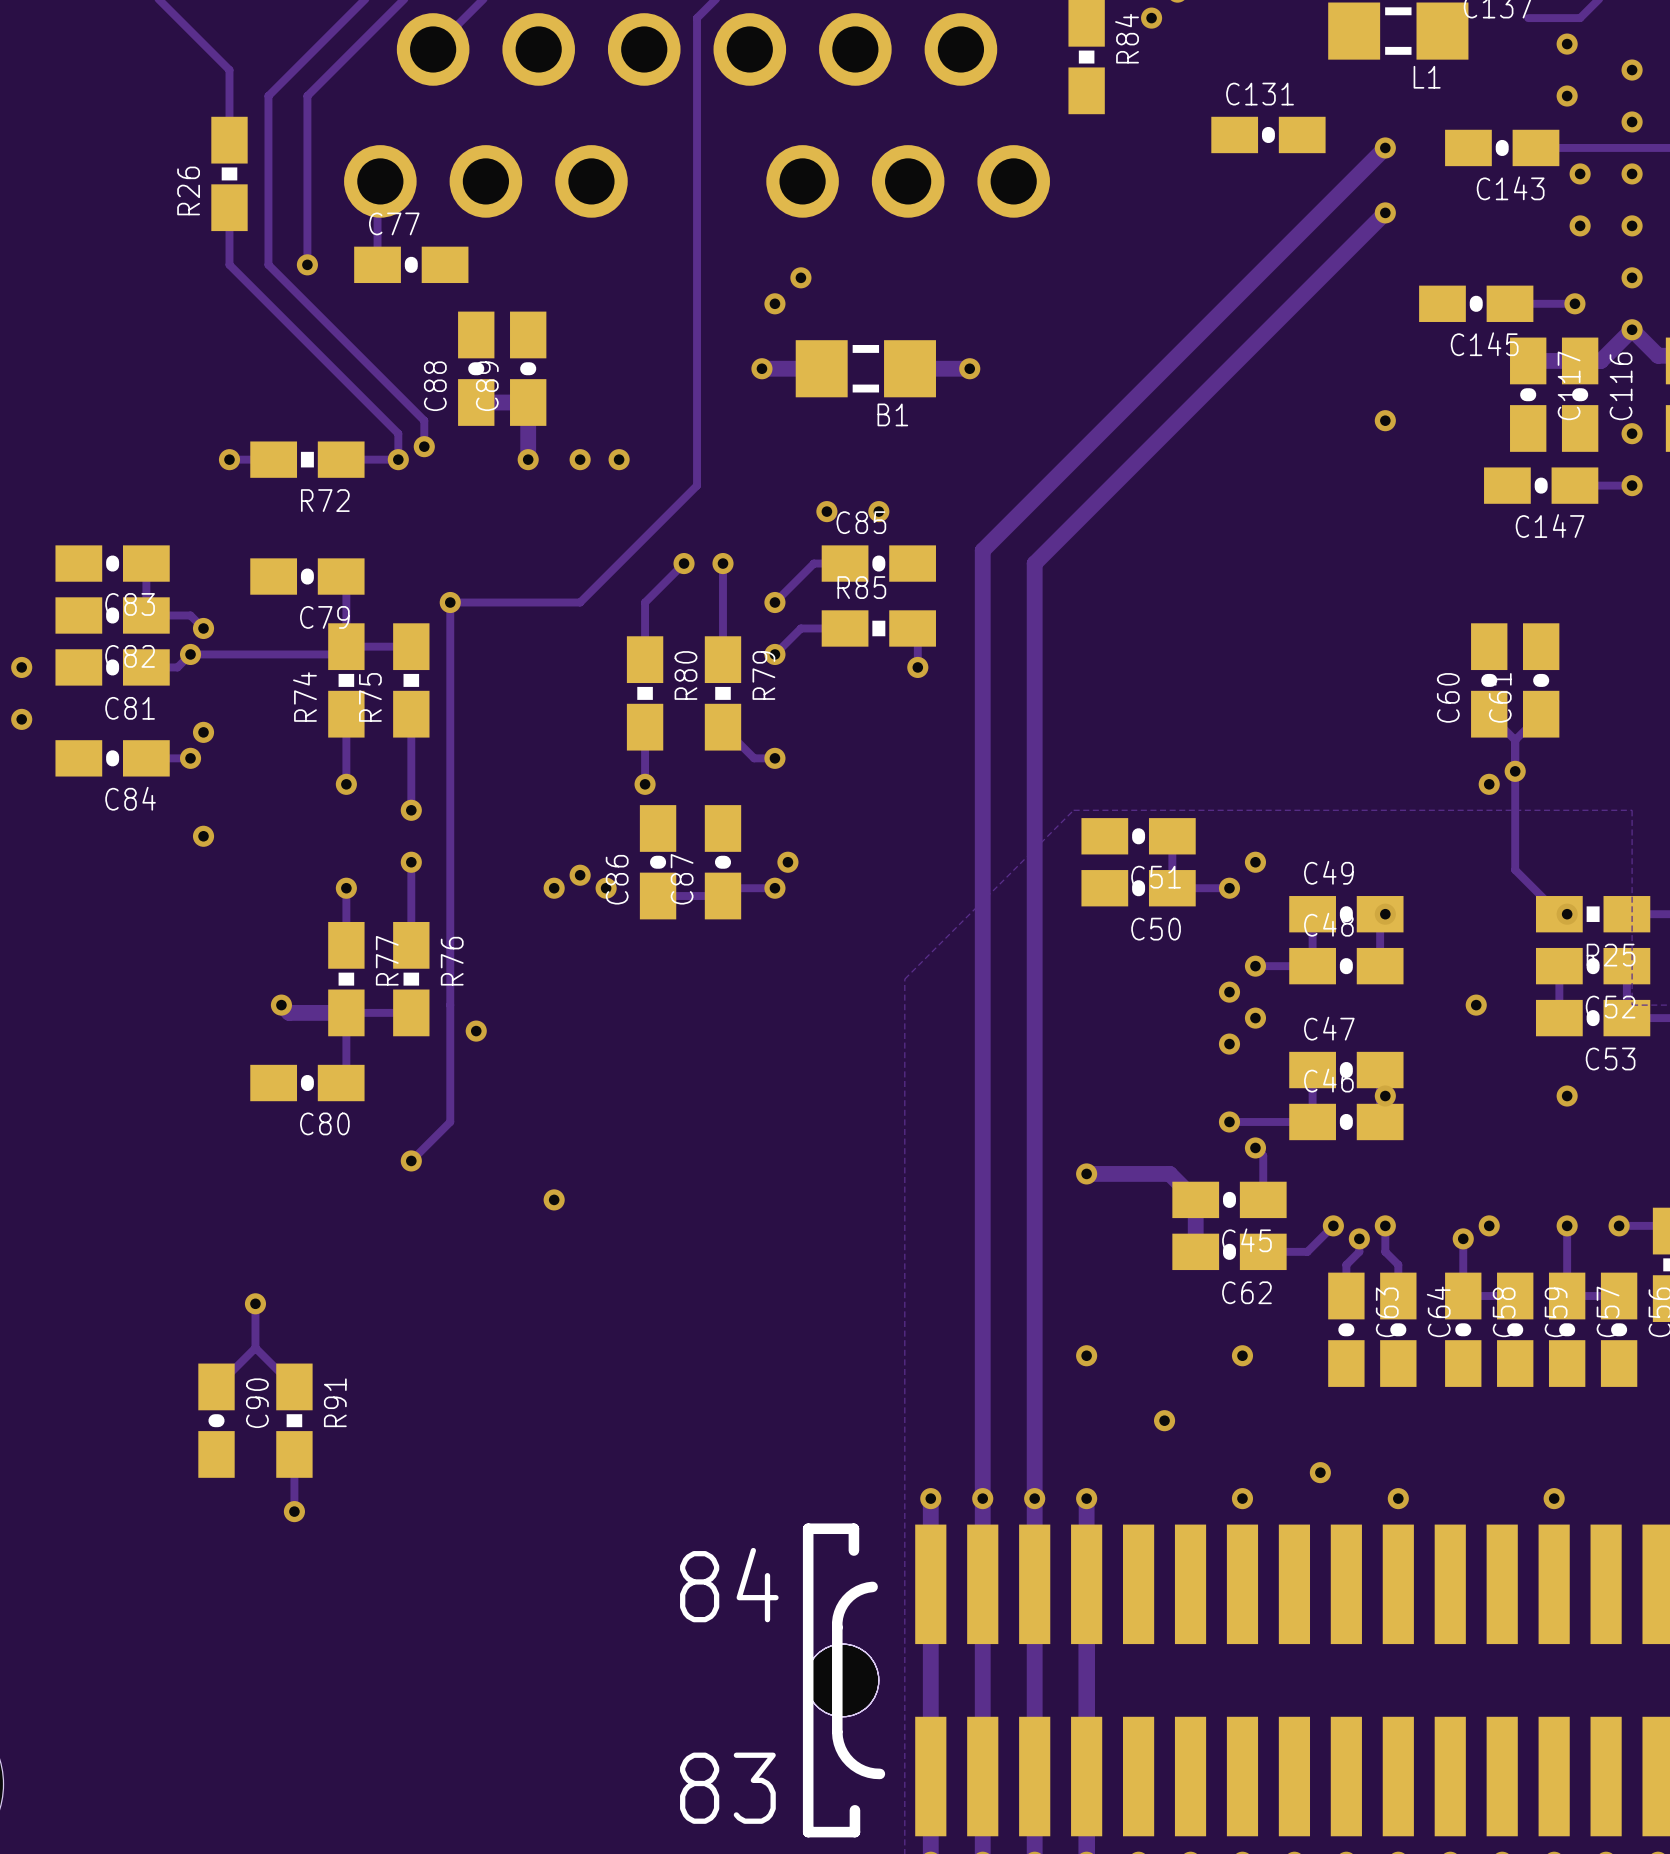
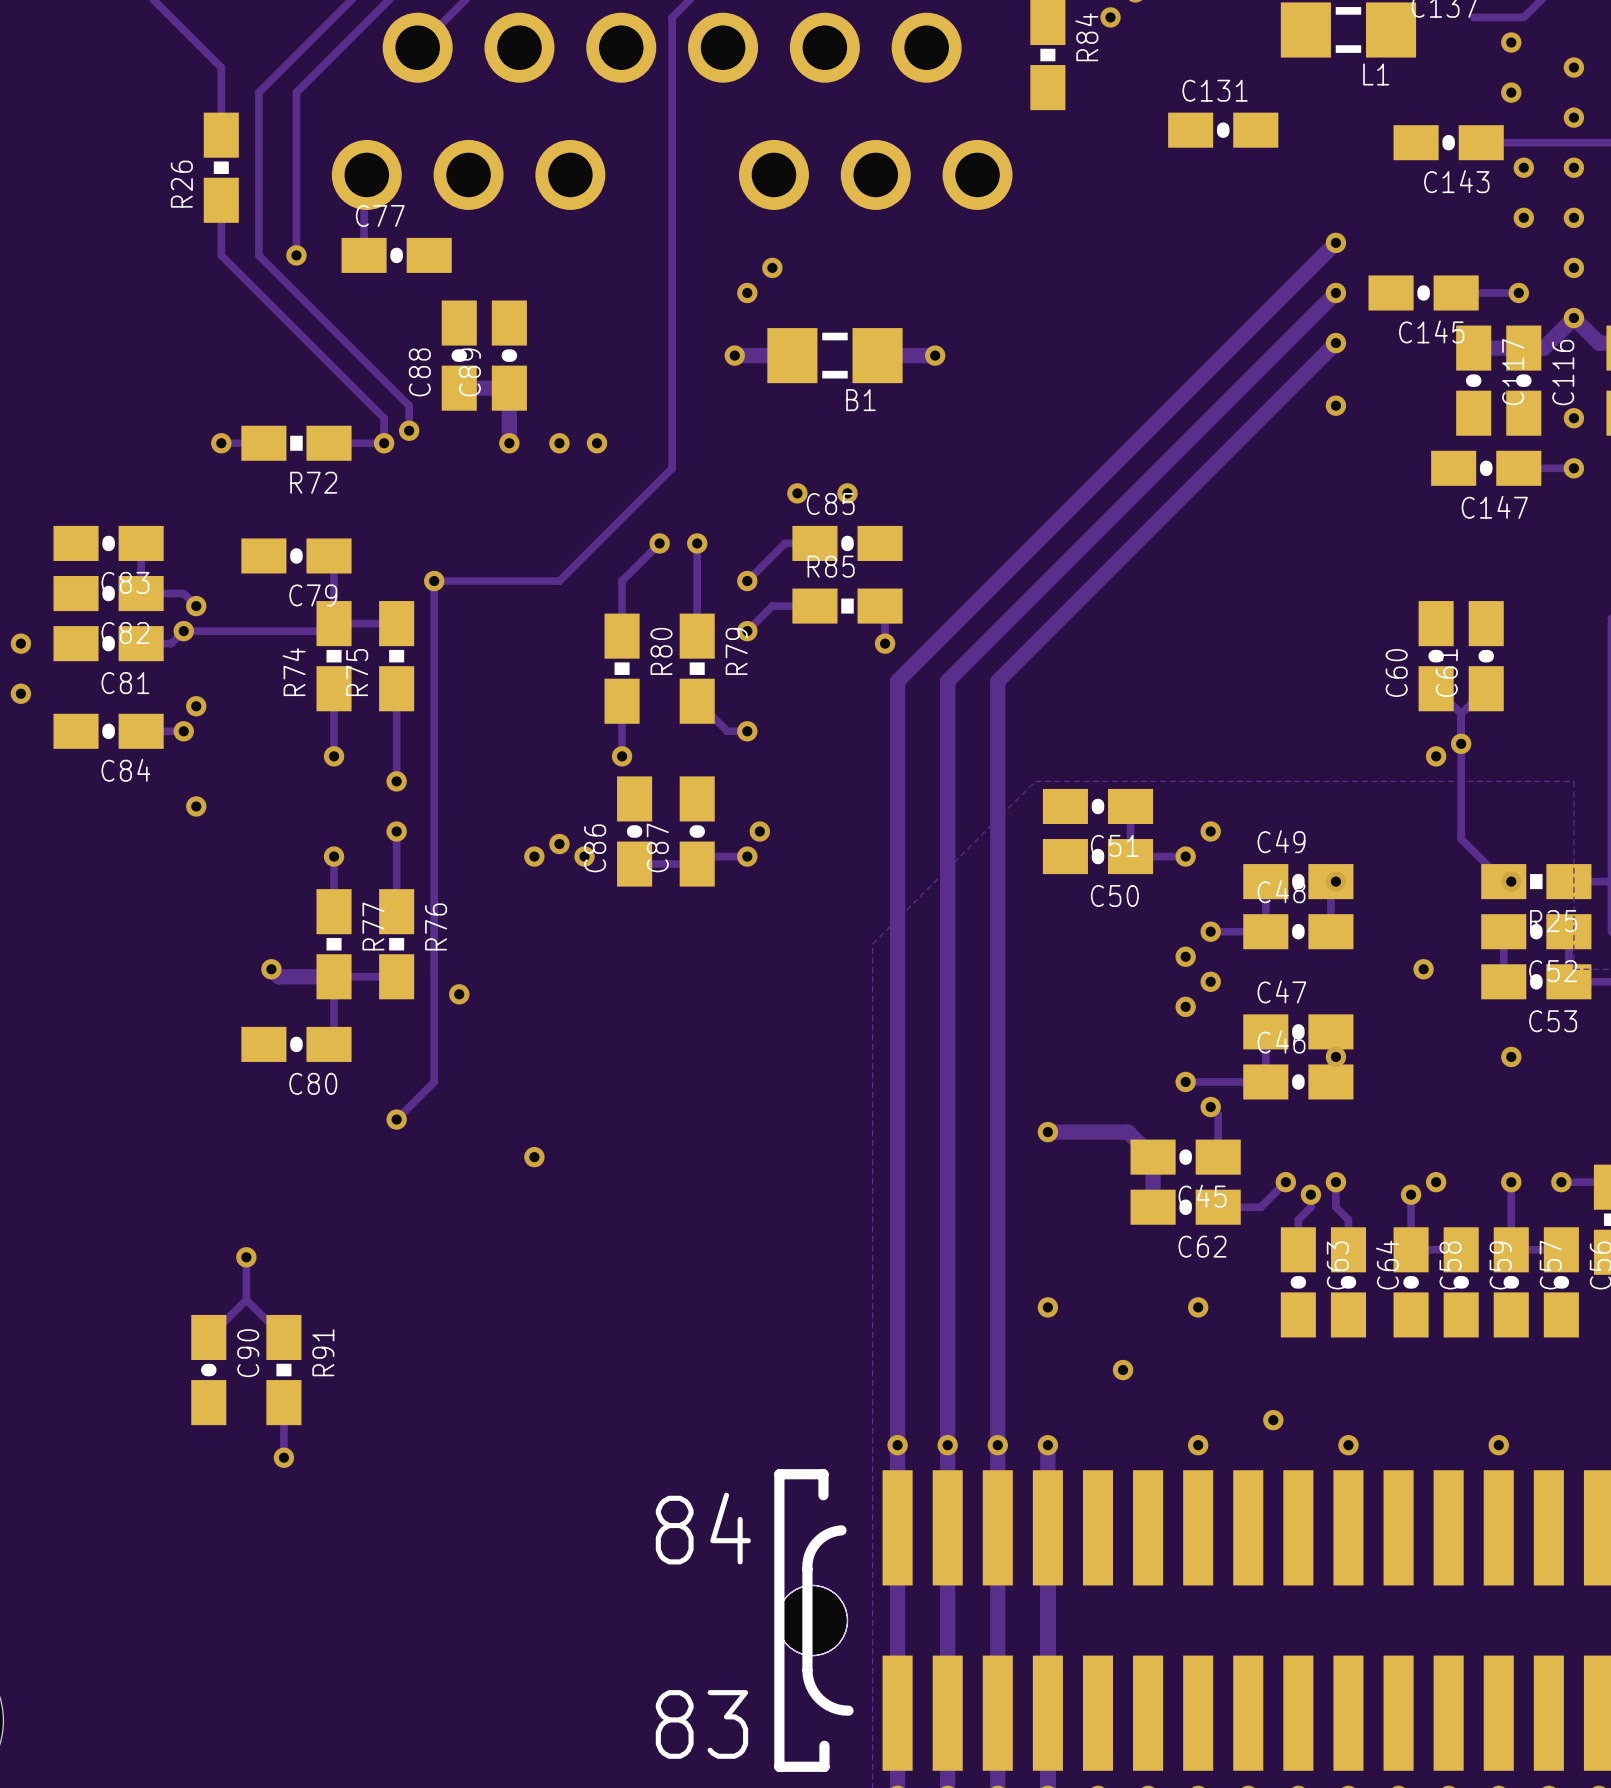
track: (1385, 147) (982, 550) (982, 706) -> (1335, 292) (947, 681)
via: (1385, 147) -> none
track: (1385, 212) (1034, 563) (1034, 706) -> (1335, 343) (997, 681)
via position: (1385, 212) -> (1335, 242)
track: none -> (1335, 242) (897, 681) (897, 1445)
via: none -> (1335, 292)
via: none -> (1335, 343)

